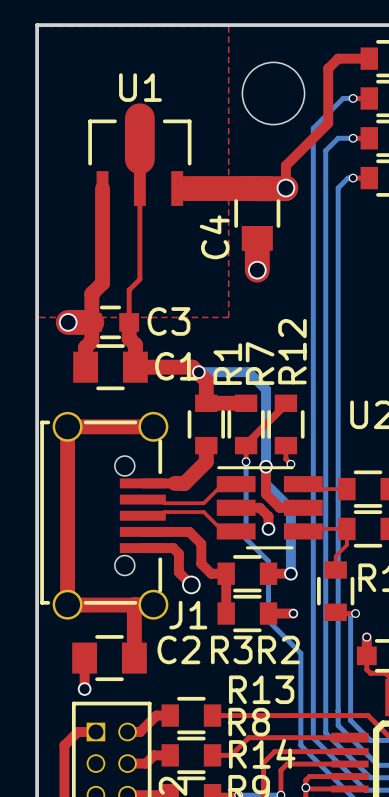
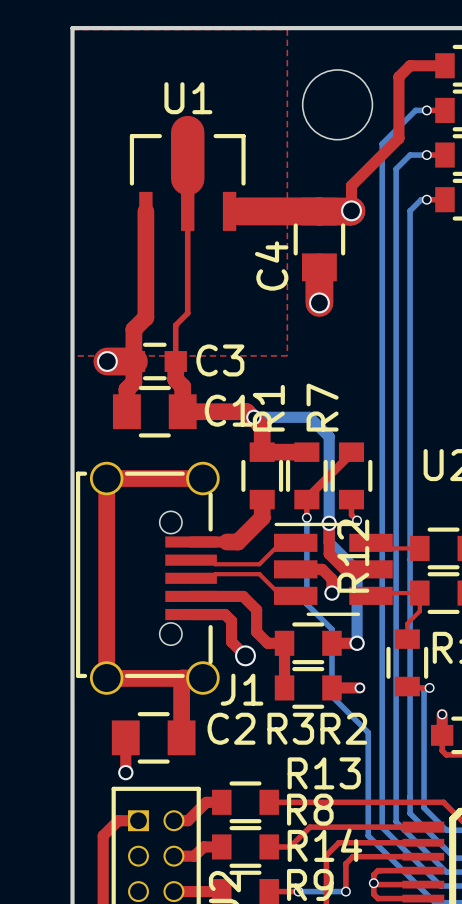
R12 name position: R12 (292, 351) -> R12 (353, 556)
R1 name position: R1 (227, 364) -> R1 (268, 408)

